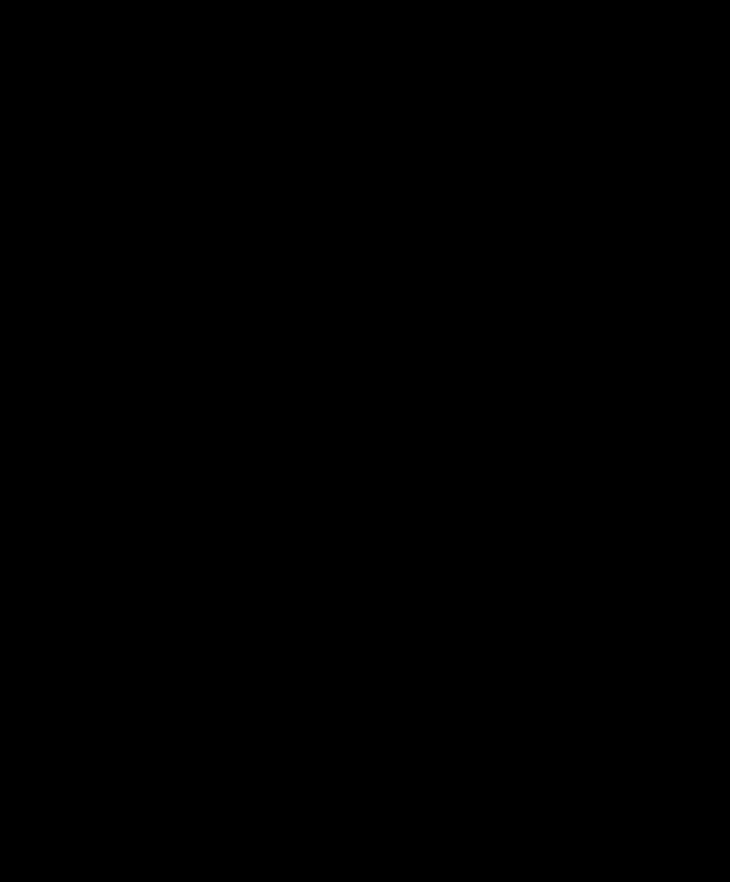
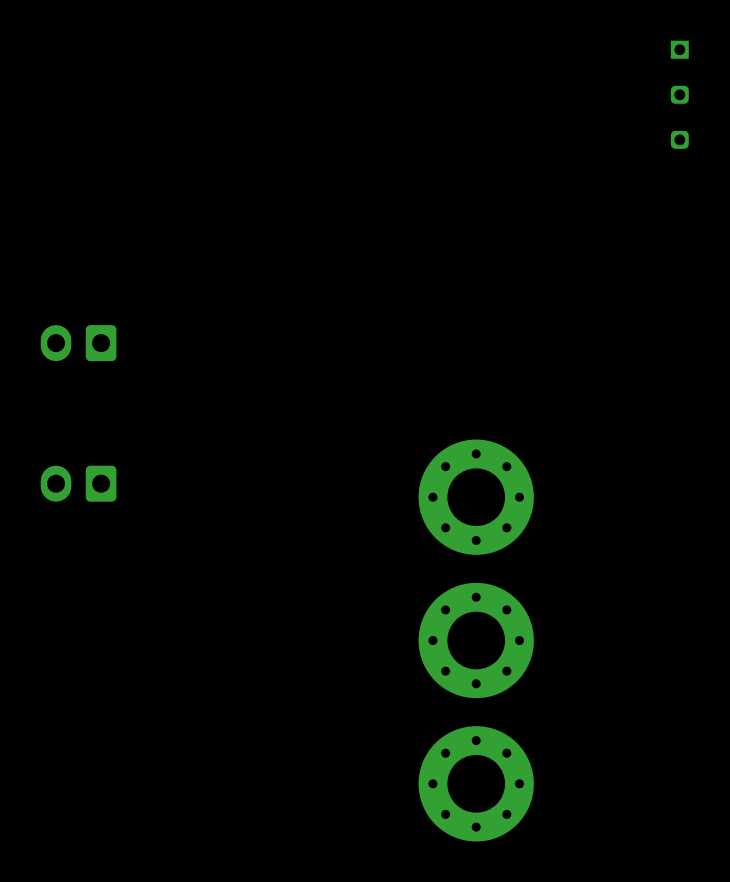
part: none -> (679, 94)
part: none -> (78, 343)
part: none -> (78, 483)
part: none -> (476, 497)
part: none -> (476, 640)
part: none -> (476, 783)

